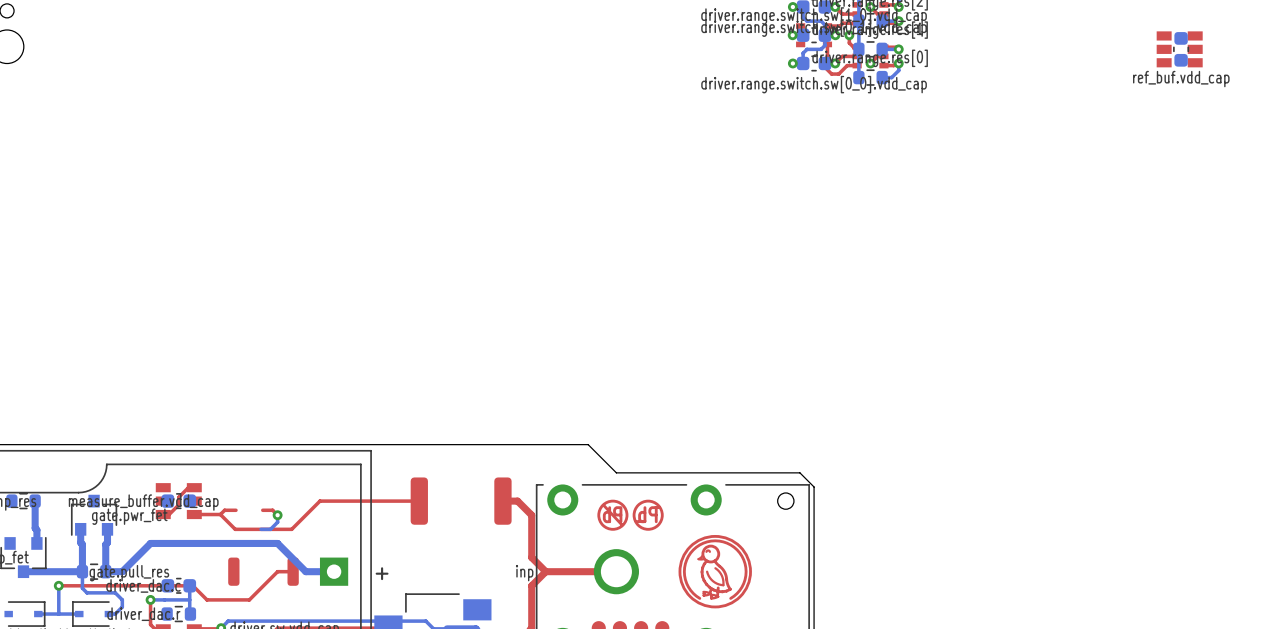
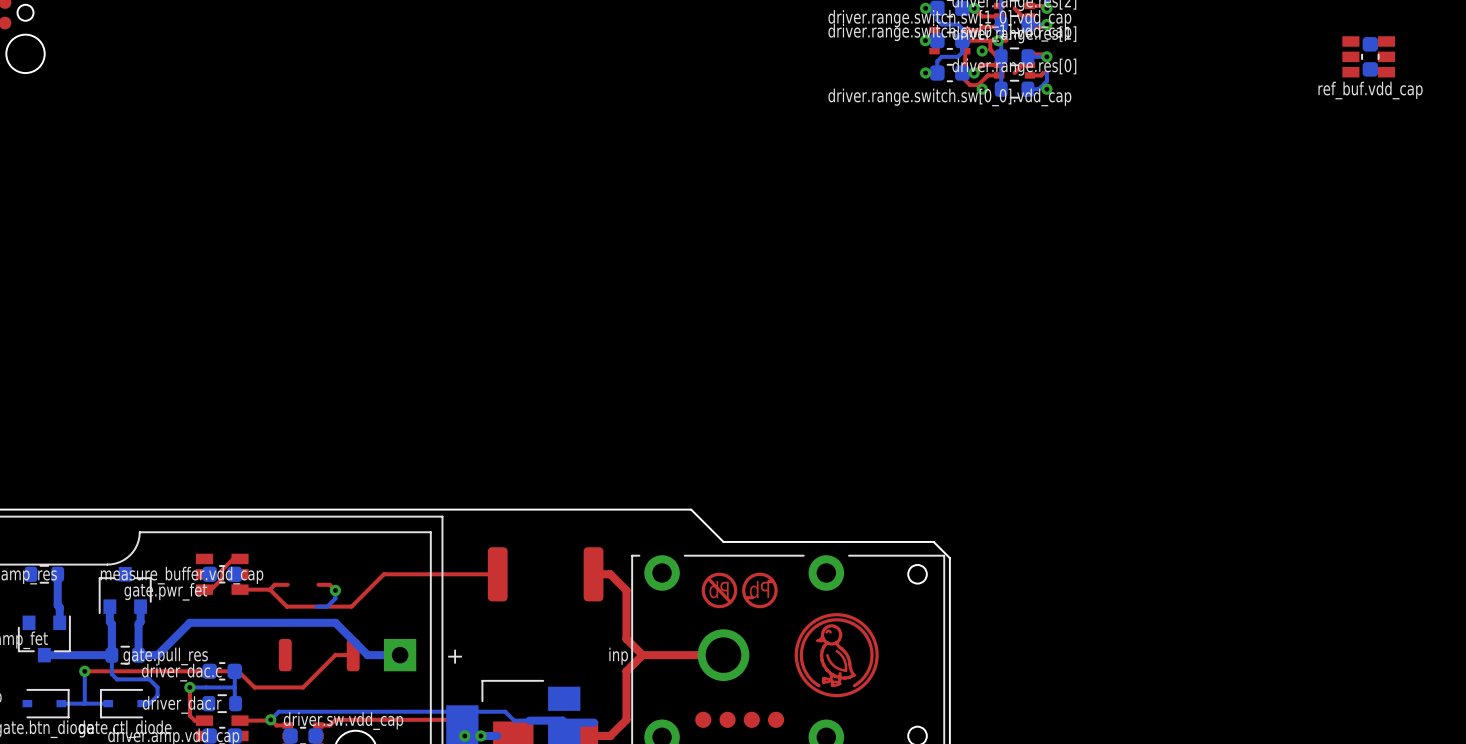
via: (870, 7) -> none
via: (835, 35) -> none
via: (849, 35) -> none
via: none -> (998, 40)
top track: none -> (1006, 40) (974, 40)
via: none -> (982, 50)
via: (870, 63) -> none
via position: (898, 63) -> (1046, 89)
via: none -> (982, 89)

